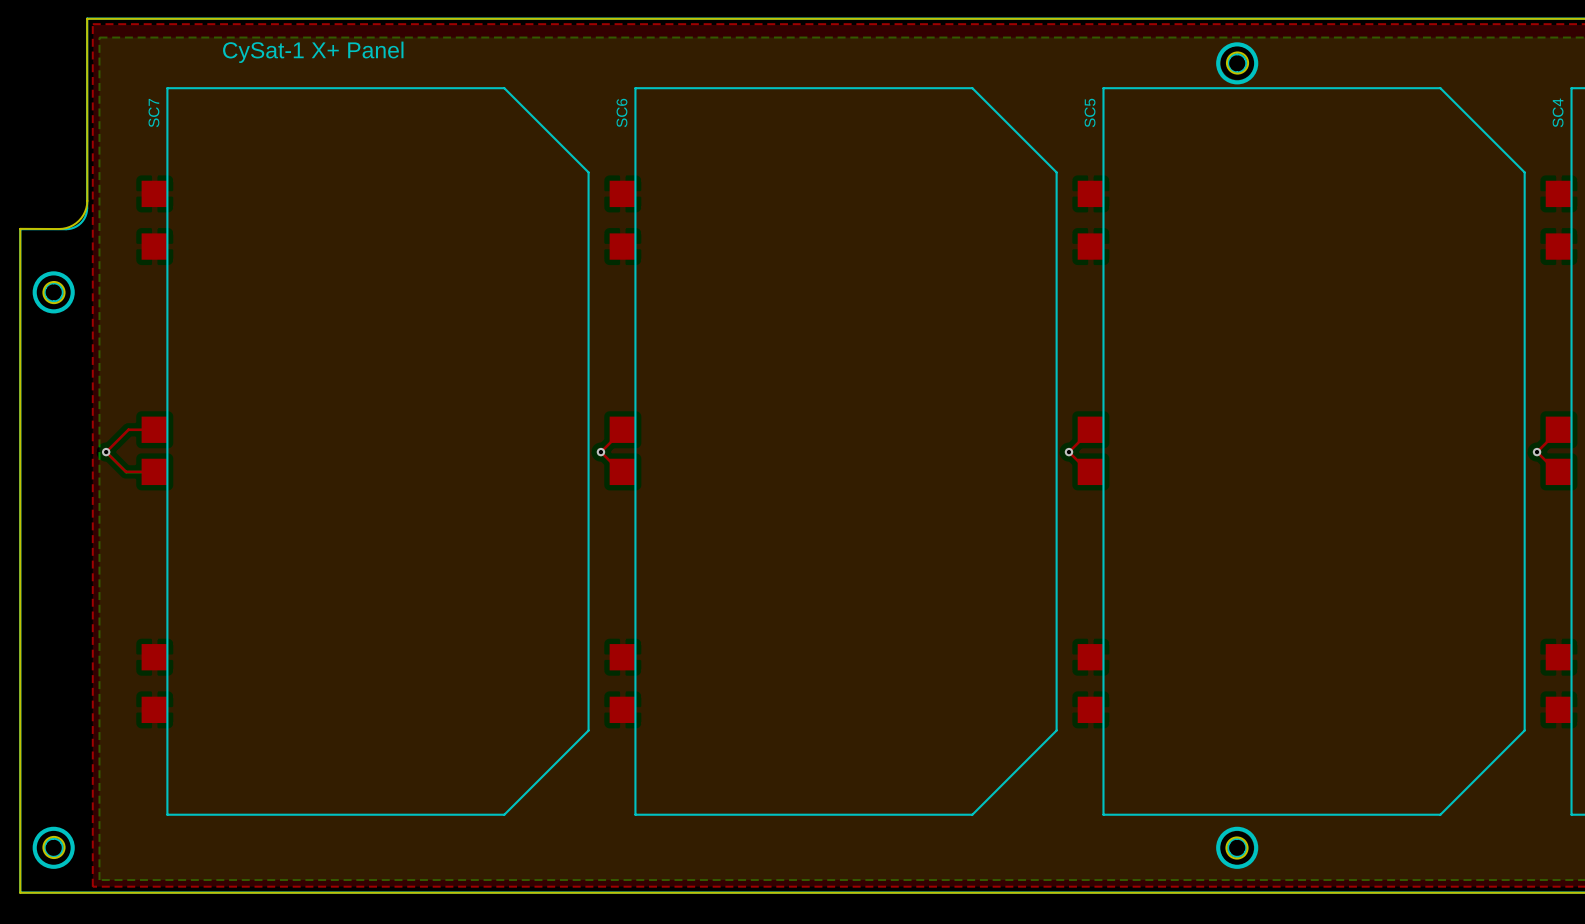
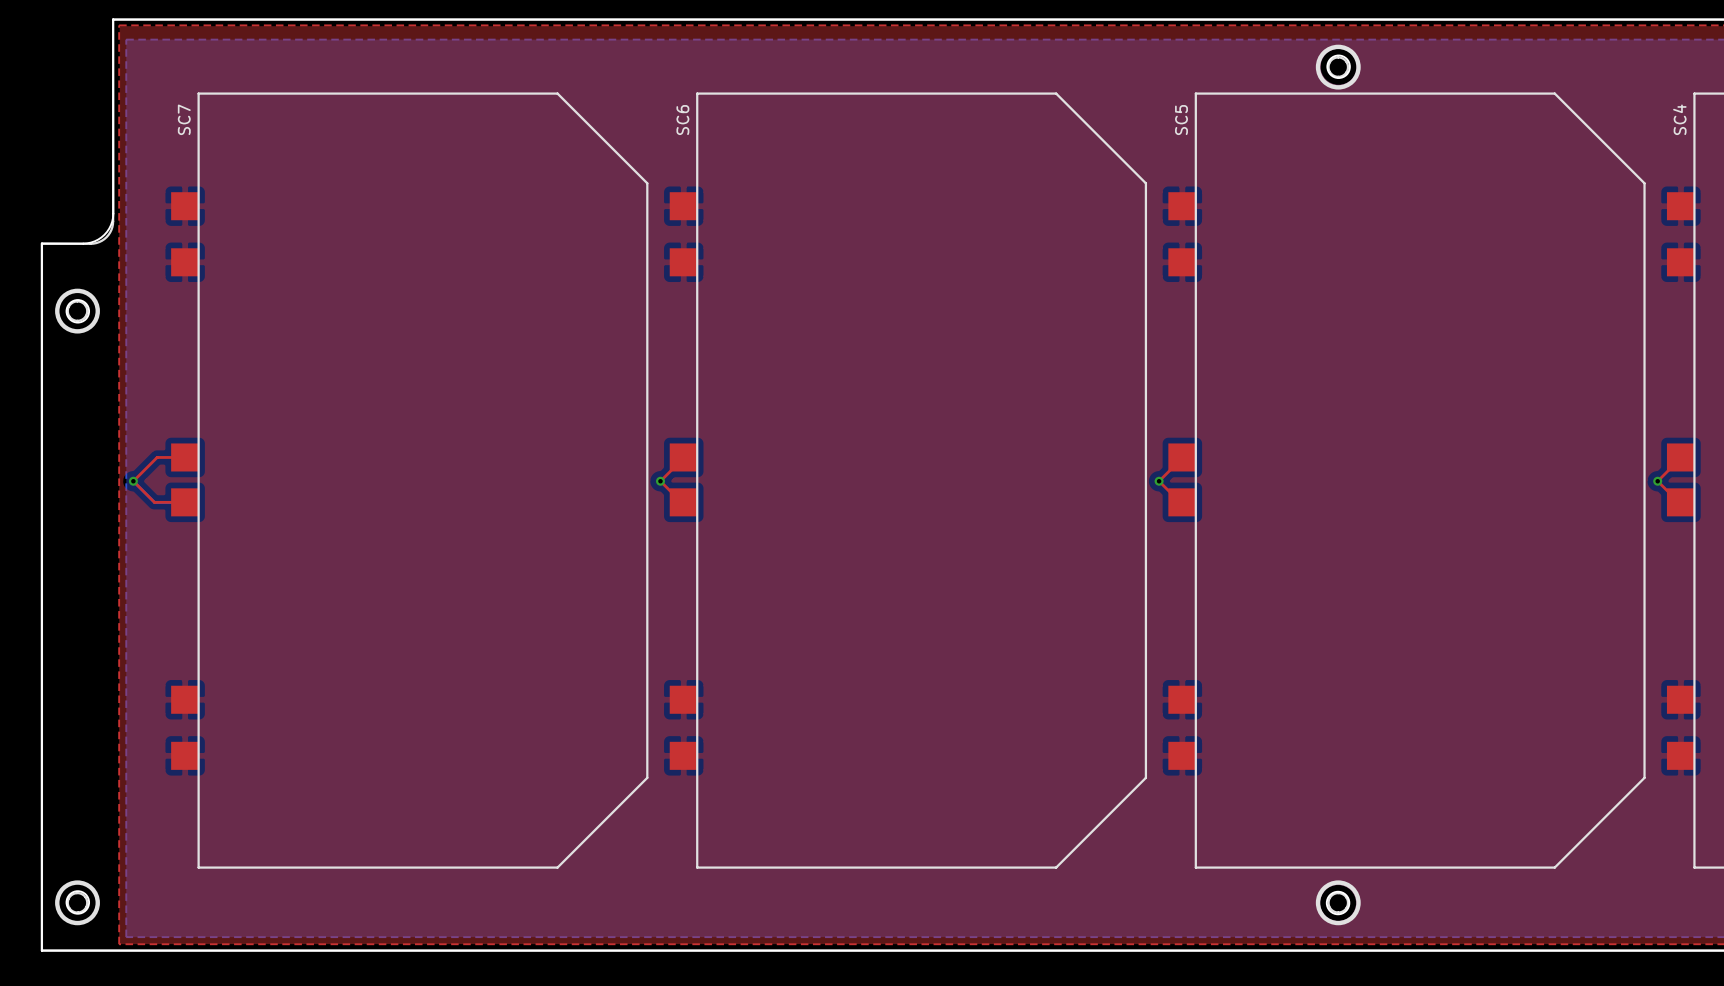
text: CySat-1 X+ Panel (313, 52) -> none

